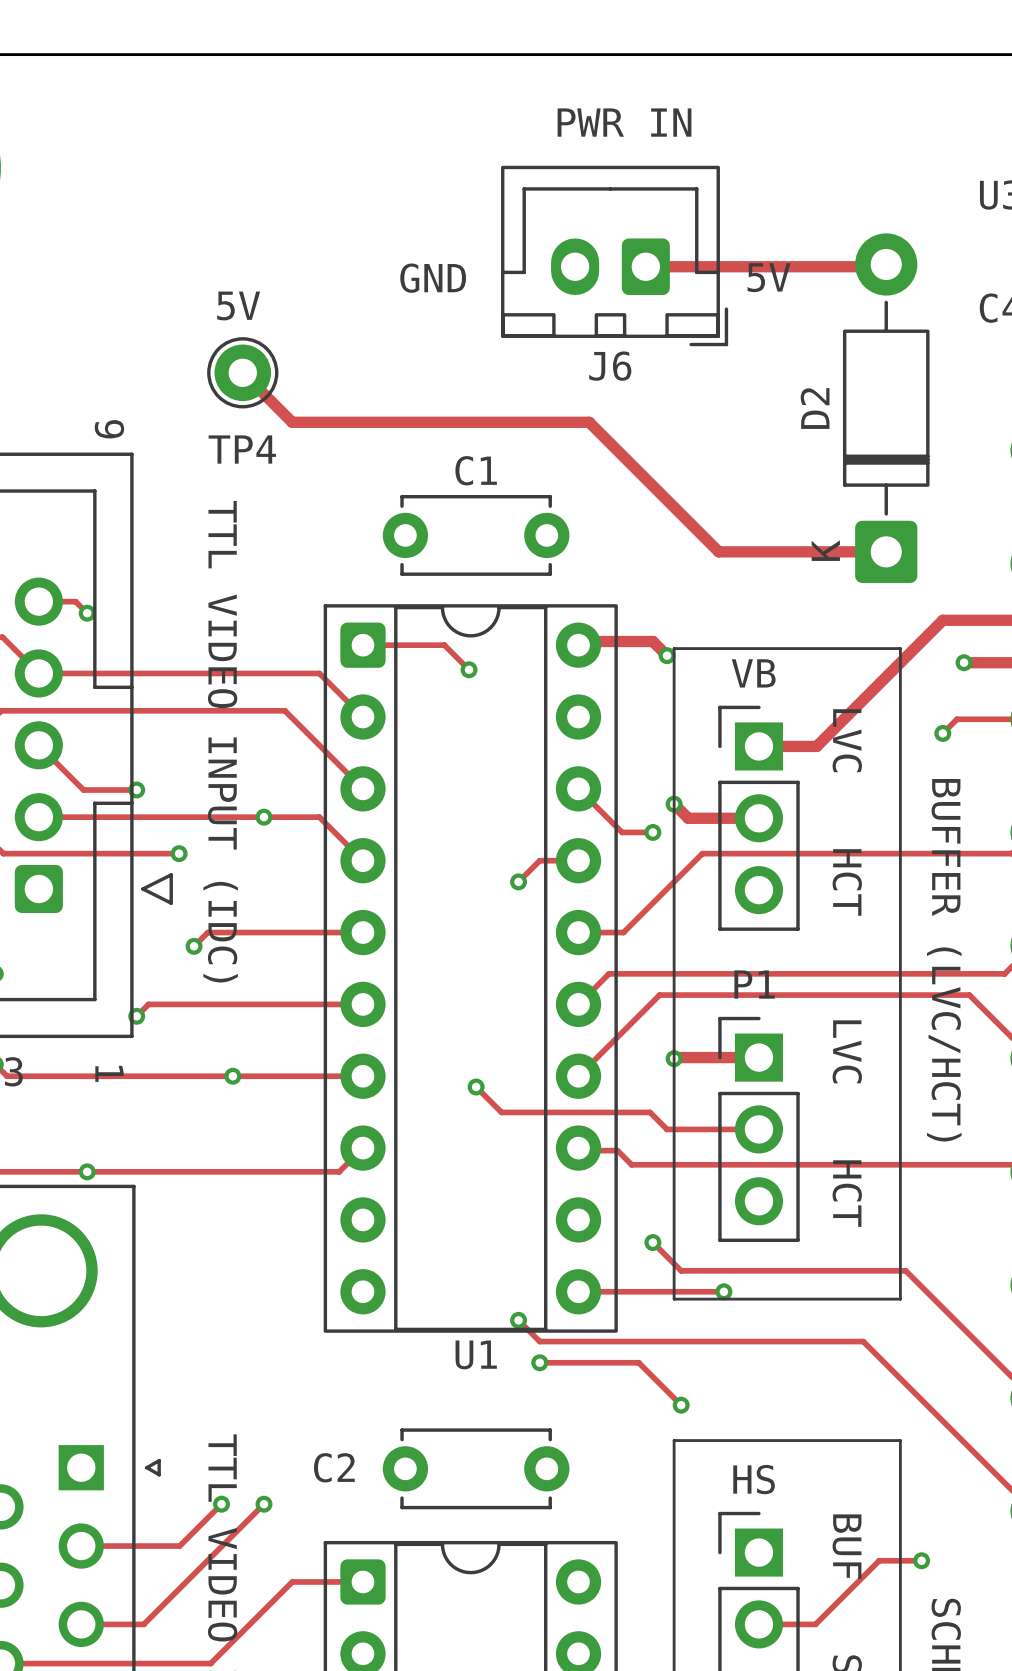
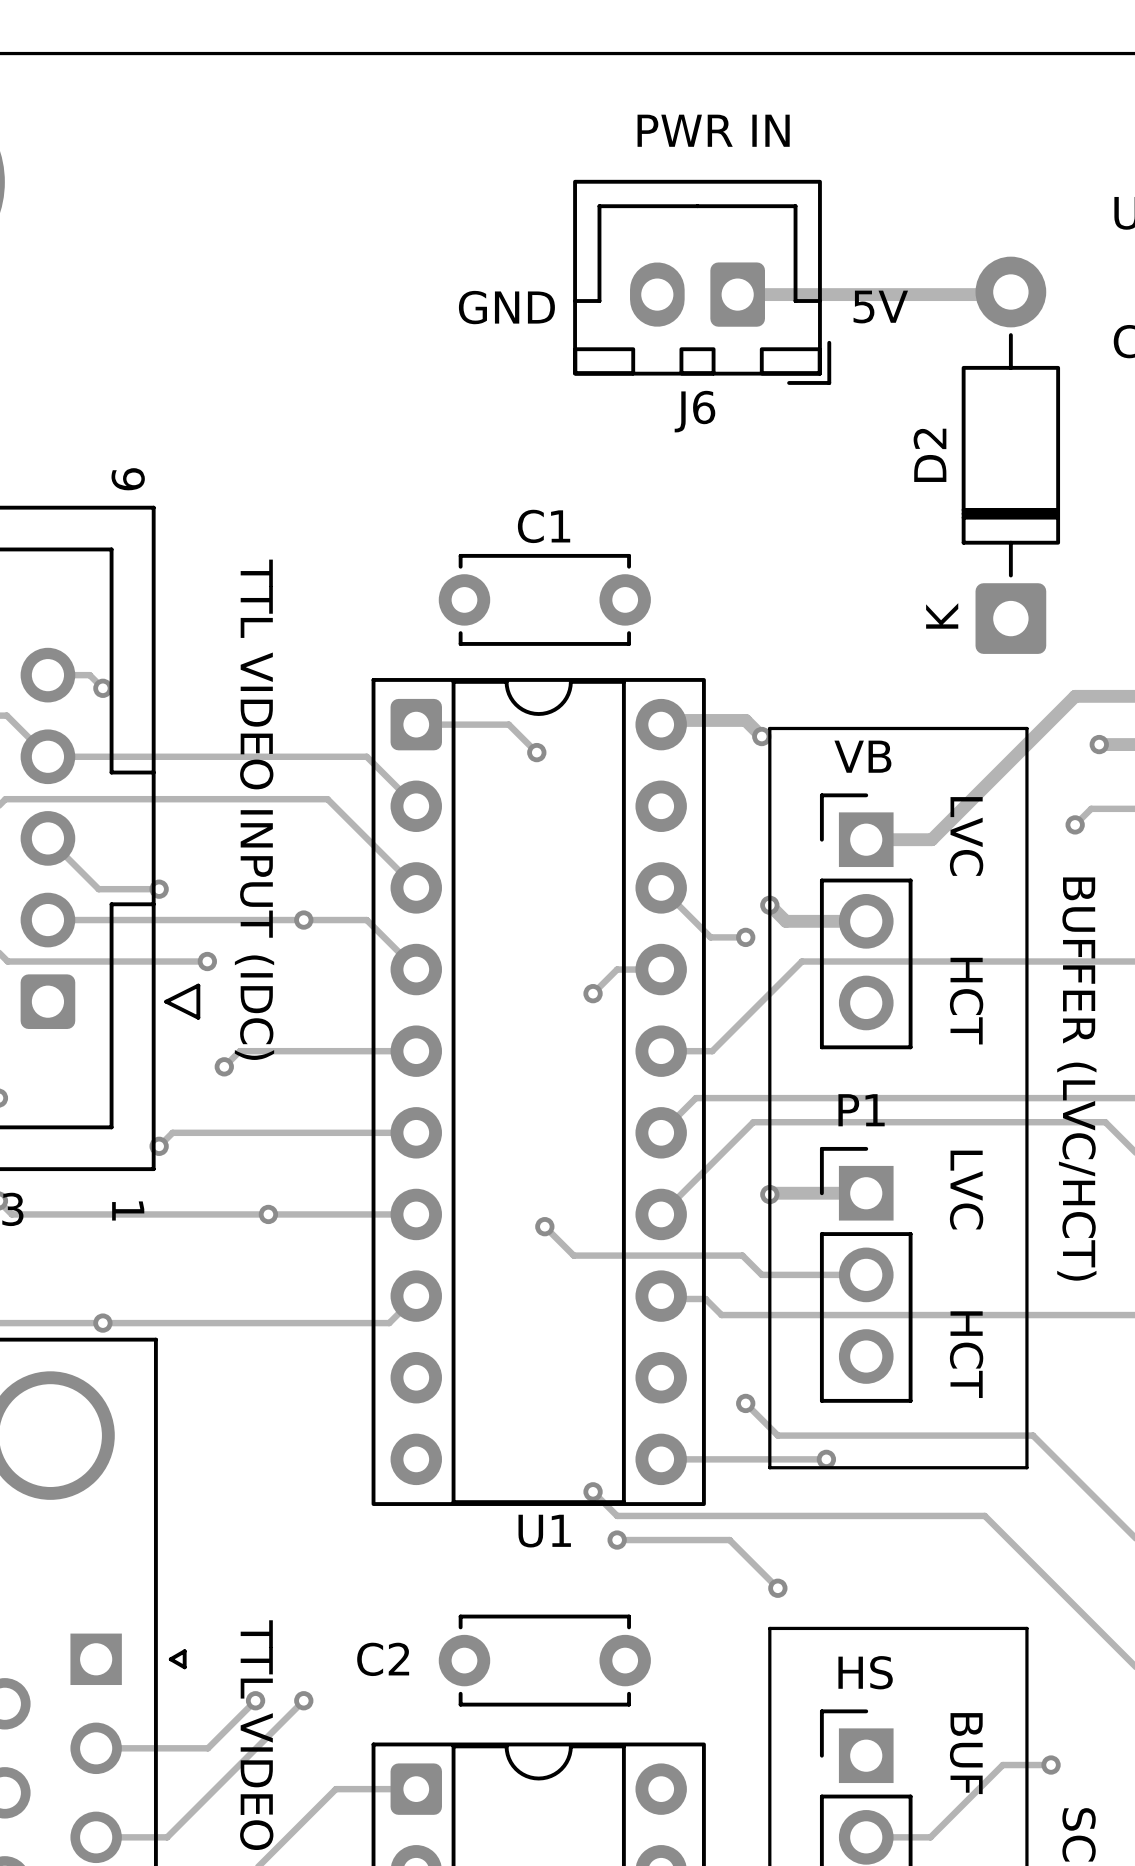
text: 5V (238, 305) -> none
track: (242, 372) (292, 422) (589, 422) (718, 551) (886, 551) -> none
part: (242, 372) -> none
text: TP4 (242, 449) -> none

